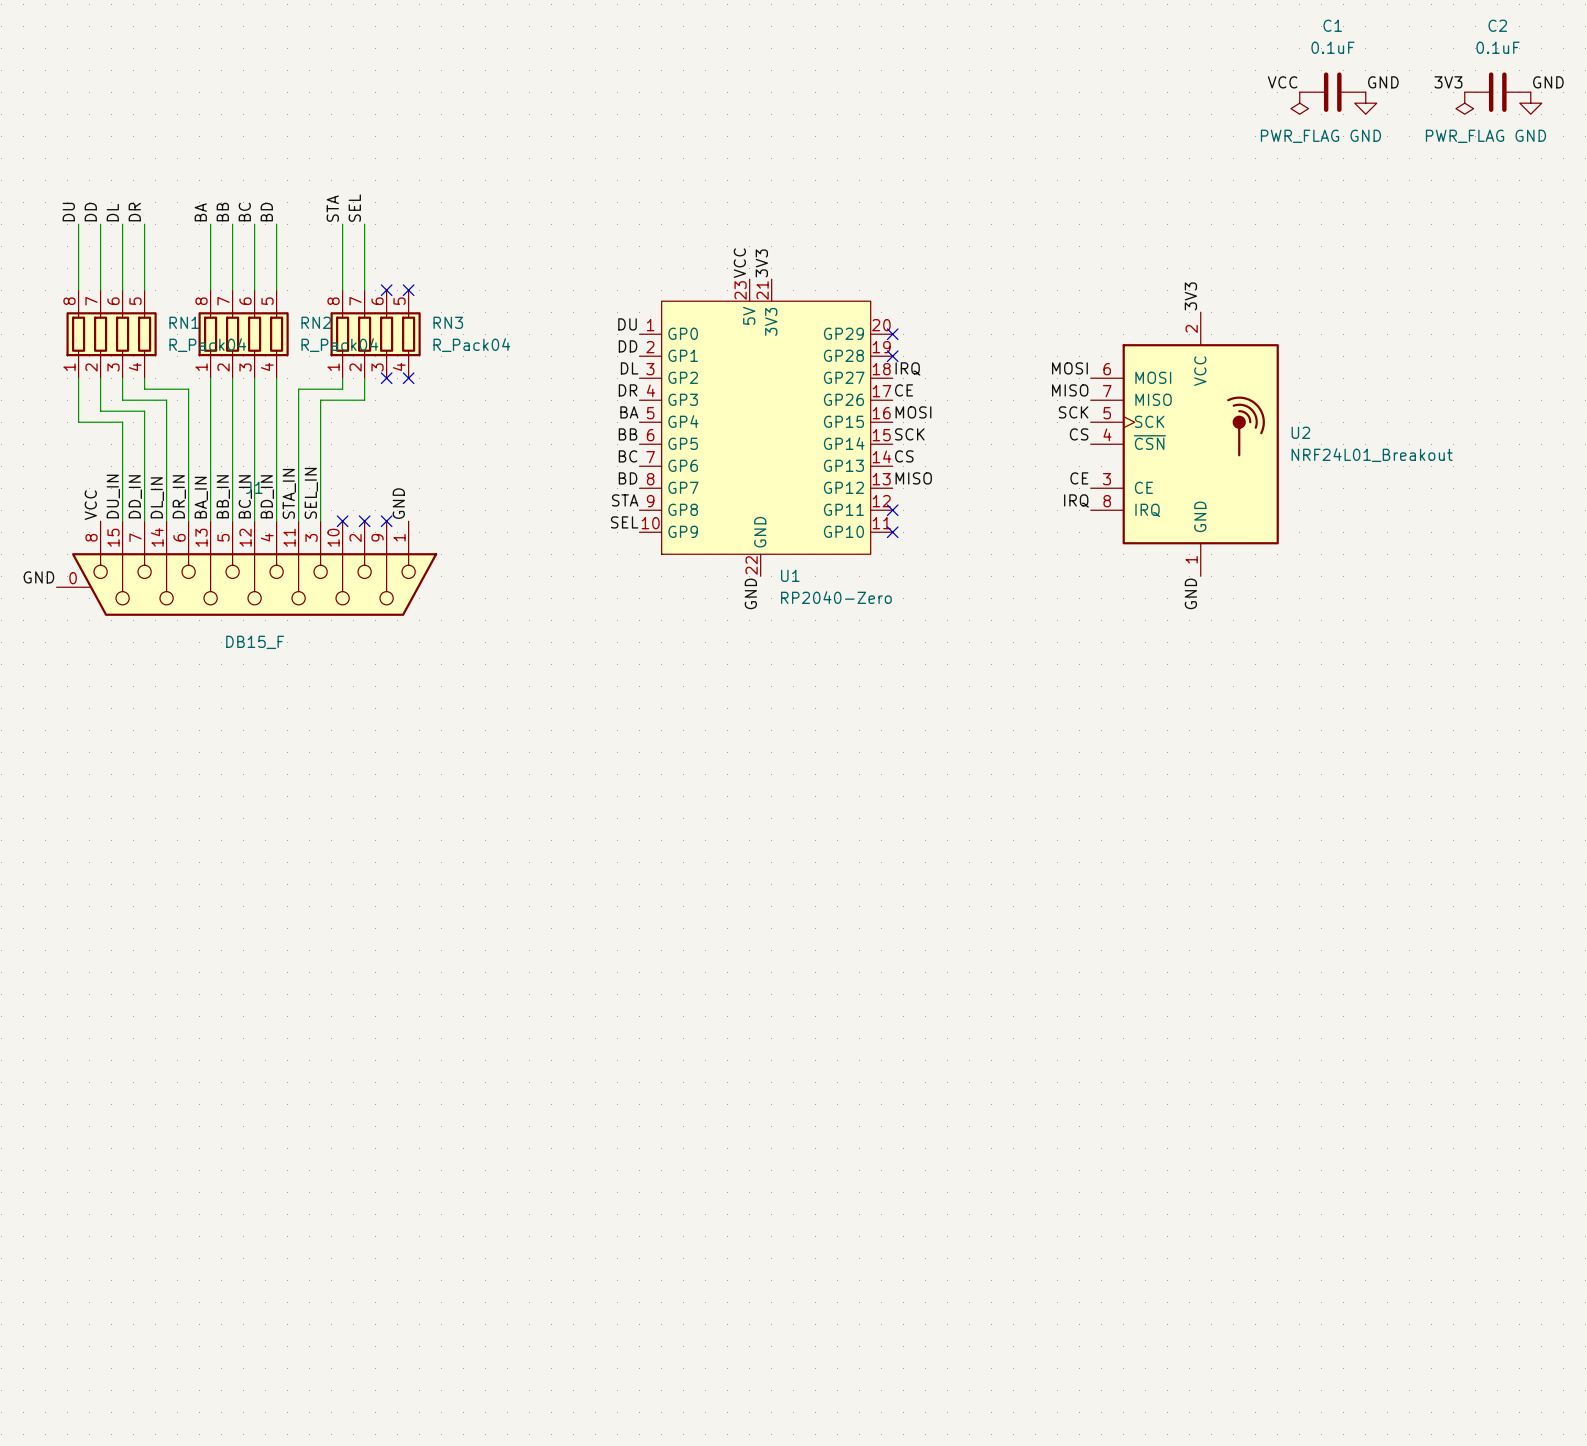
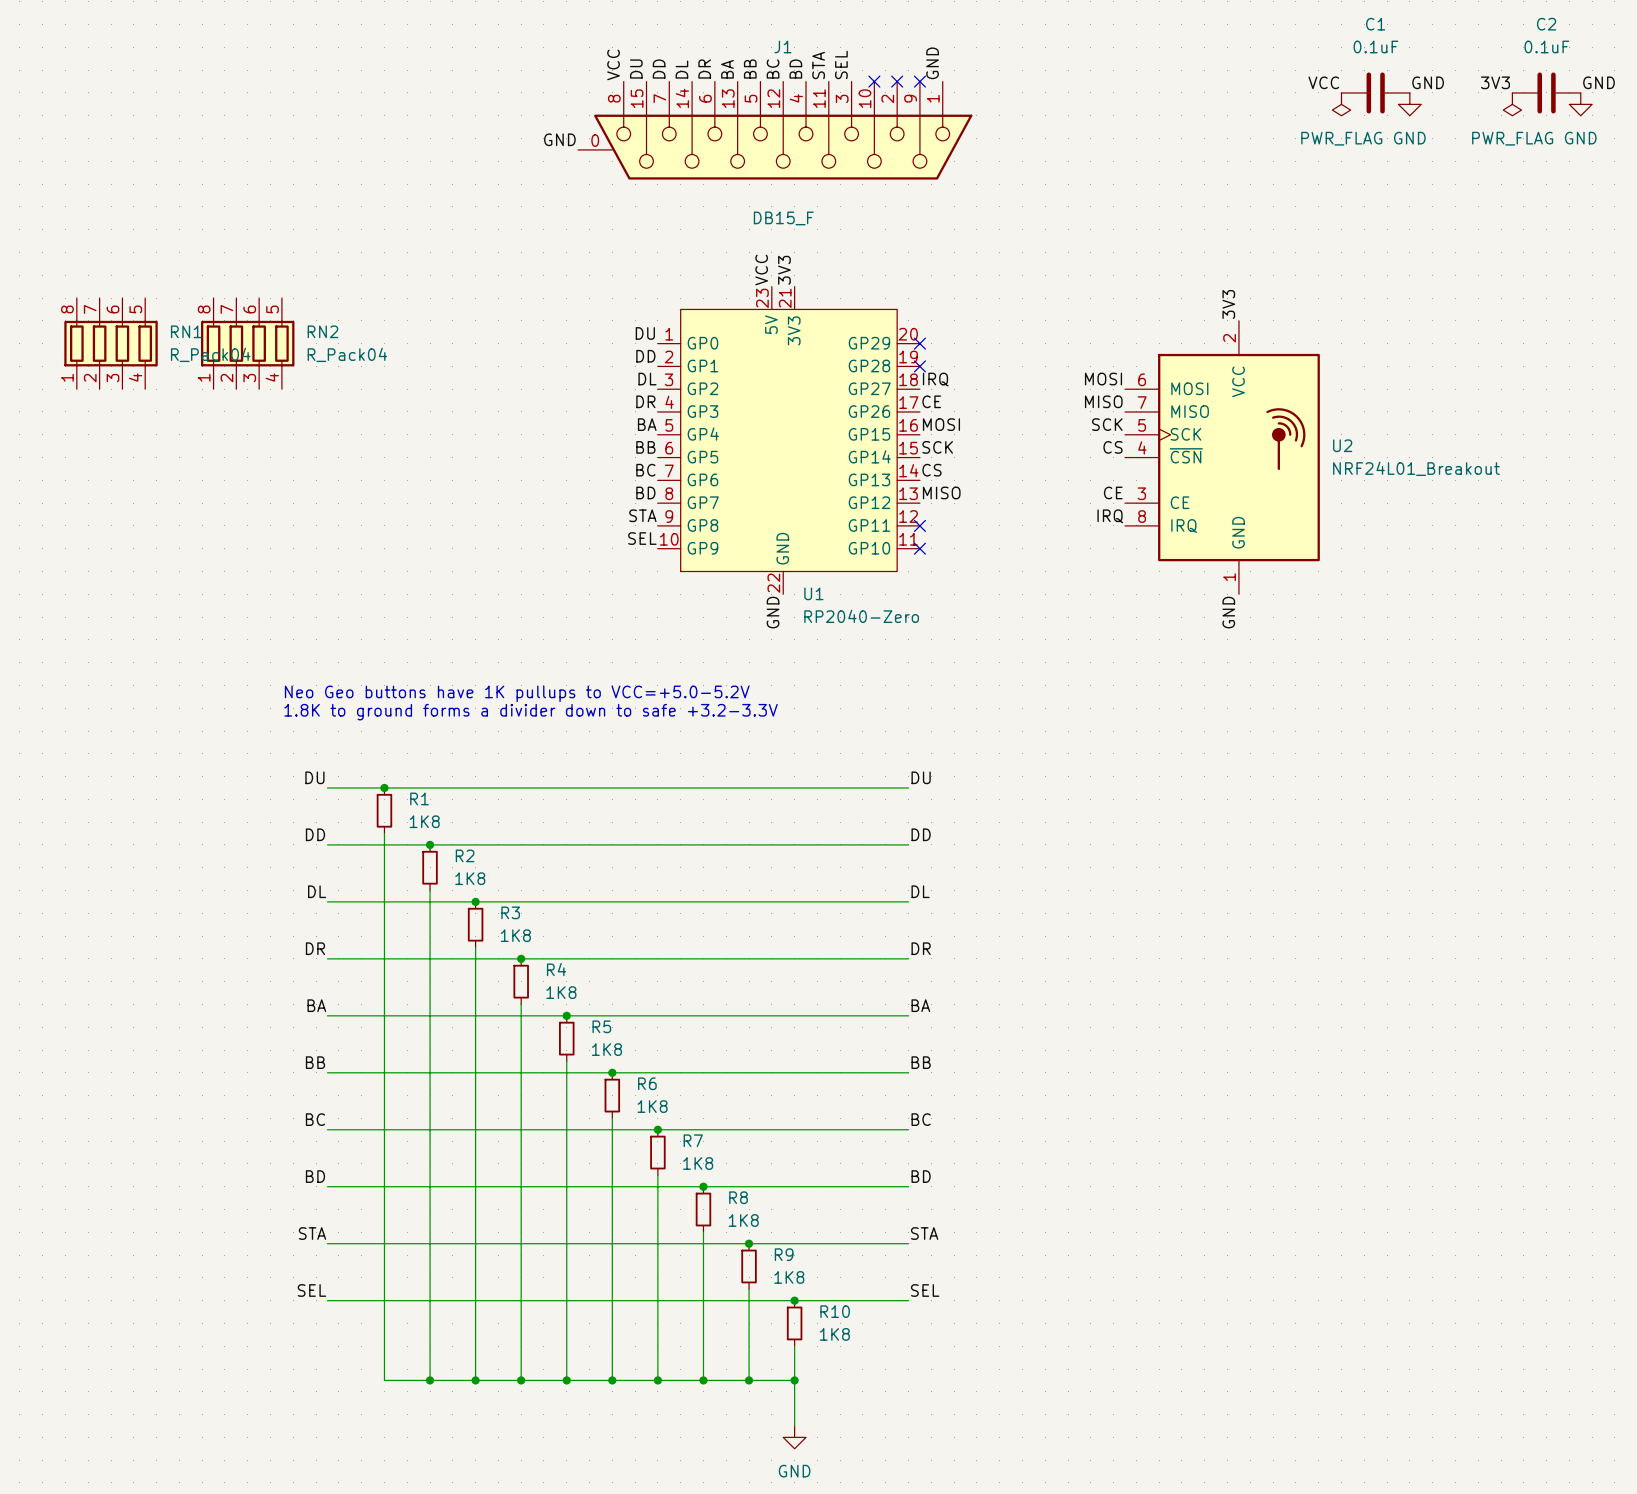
label: none -> GND (932, 63)
label: none -> VCC (613, 64)
label: none -> STA (818, 65)
label: none -> SEL (841, 64)
label: none -> DU (636, 69)
label: none -> DD (659, 69)
label: none -> DL (681, 69)
label: none -> DR (704, 69)
label: none -> BA (727, 69)
label: none -> BB (750, 69)
label: none -> BC (773, 69)
label: none -> BD (795, 69)
no-connect mark: none -> (874, 81)
no-connect mark: none -> (897, 81)
no-connect mark: none -> (919, 81)
label: none -> GND (559, 139)
label: STA (332, 208) -> none
label: SEL (354, 208) -> none
label: DU (68, 212) -> none
label: DD (90, 212) -> none
label: DL (112, 212) -> none
label: DR (134, 212) -> none
label: BA (200, 212) -> none
label: BB (222, 212) -> none
label: BC (244, 212) -> none
label: BD (266, 212) -> none
wire: (78, 224) (78, 290) -> none
wire: (100, 224) (100, 290) -> none
wire: (122, 224) (122, 290) -> none
wire: (144, 224) (144, 290) -> none
wire: (210, 224) (210, 290) -> none
wire: (232, 224) (232, 290) -> none
wire: (254, 224) (254, 290) -> none
wire: (276, 224) (276, 290) -> none
wire: (342, 224) (342, 290) -> none
wire: (364, 224) (364, 290) -> none
no-connect mark: (386, 290) -> none
no-connect mark: (408, 290) -> none
RN3: R_Pack04 (375, 334) -> none
wire: (78, 378) (78, 422) (122, 422) (122, 521) -> none
wire: (100, 378) (100, 411) (144, 411) (144, 521) -> none
wire: (122, 378) (122, 400) (166, 400) (166, 521) -> none
wire: (144, 378) (144, 389) (188, 389) (188, 521) -> none
wire: (210, 378) (210, 521) -> none
wire: (232, 378) (232, 521) -> none
wire: (254, 378) (254, 521) -> none
wire: (276, 378) (276, 521) -> none
wire: (342, 378) (342, 389) (298, 389) (298, 521) -> none
wire: (364, 378) (364, 400) (320, 400) (320, 521) -> none
no-connect mark: (386, 378) -> none
no-connect mark: (408, 378) -> none
label: STA_IN (289, 493) -> none
label: SEL_IN (311, 493) -> none
label: DU_IN (113, 496) -> none
label: DD_IN (135, 496) -> none
label: DR_IN (179, 496) -> none
label: BB_IN (223, 496) -> none
label: BC_IN (245, 496) -> none
label: BD_IN (267, 496) -> none
label: DL_IN (157, 497) -> none
label: BA_IN (201, 497) -> none
label: GND (398, 503) -> none
label: VCC (90, 505) -> none
no-connect mark: (342, 521) -> none
no-connect mark: (364, 521) -> none
no-connect mark: (386, 521) -> none
J1 position: (246, 568) -> (775, 130)
label: GND (38, 577) -> none
J1 value position: DB15_F (255, 642) -> DB15_F (783, 218)
text: none -> Neo Geo buttons have 1K pullups to VCC=+5.0-5.2V (517, 693)
text: none -> 1.8K to ground forms a divider down to safe +3.2-3.3V (531, 712)
label: none -> DU (314, 777)
label: none -> DU (921, 777)
wire: none -> (327, 787) (908, 787)
junction: none -> (384, 787)
R1: none -> 1K8 (384, 810)
wire: none -> (384, 833) (384, 1380) (794, 1380)
label: none -> DD (315, 834)
label: none -> DD (921, 834)
wire: none -> (327, 844) (908, 844)
junction: none -> (430, 844)
R2: none -> 1K8 (430, 867)
wire: none -> (430, 890) (430, 1380)
label: none -> DL (317, 891)
label: none -> DL (920, 891)
wire: none -> (327, 901) (908, 901)
junction: none -> (475, 901)
R3: none -> 1K8 (475, 924)
wire: none -> (475, 947) (475, 1380)
label: none -> DR (315, 948)
label: none -> DR (921, 948)
wire: none -> (327, 958) (908, 958)
junction: none -> (521, 958)
R4: none -> 1K8 (521, 981)
wire: none -> (521, 1004) (521, 1380)
label: none -> BA (316, 1005)
label: none -> BA (920, 1005)
wire: none -> (327, 1015) (908, 1015)
junction: none -> (566, 1015)
R5: none -> 1K8 (566, 1038)
wire: none -> (566, 1061) (566, 1380)
label: none -> BB (315, 1062)
label: none -> BB (921, 1062)
wire: none -> (327, 1072) (908, 1072)
junction: none -> (612, 1072)
R6: none -> 1K8 (612, 1095)
wire: none -> (612, 1118) (612, 1380)
label: none -> BC (315, 1119)
label: none -> BC (921, 1119)
wire: none -> (327, 1129) (908, 1129)
junction: none -> (657, 1129)
R7: none -> 1K8 (657, 1152)
wire: none -> (657, 1175) (657, 1380)
label: none -> BD (315, 1176)
label: none -> BD (921, 1176)
wire: none -> (327, 1186) (908, 1186)
junction: none -> (703, 1186)
R8: none -> 1K8 (703, 1209)
wire: none -> (703, 1232) (703, 1380)
label: none -> STA (312, 1233)
label: none -> STA (924, 1233)
wire: none -> (327, 1243) (908, 1243)
junction: none -> (749, 1243)
R9: none -> 1K8 (749, 1266)
wire: none -> (749, 1289) (749, 1380)
label: none -> SEL (311, 1290)
label: none -> SEL (925, 1290)
wire: none -> (327, 1300) (908, 1300)
junction: none -> (794, 1300)
R10: none -> 1K8 (794, 1323)
wire: none -> (794, 1346) (794, 1425)
junction: none -> (430, 1380)
junction: none -> (475, 1380)
junction: none -> (521, 1380)
junction: none -> (566, 1380)
junction: none -> (612, 1380)
junction: none -> (657, 1380)
junction: none -> (703, 1380)
junction: none -> (749, 1380)
junction: none -> (794, 1380)
power symbol: none -> GND (794, 1437)

